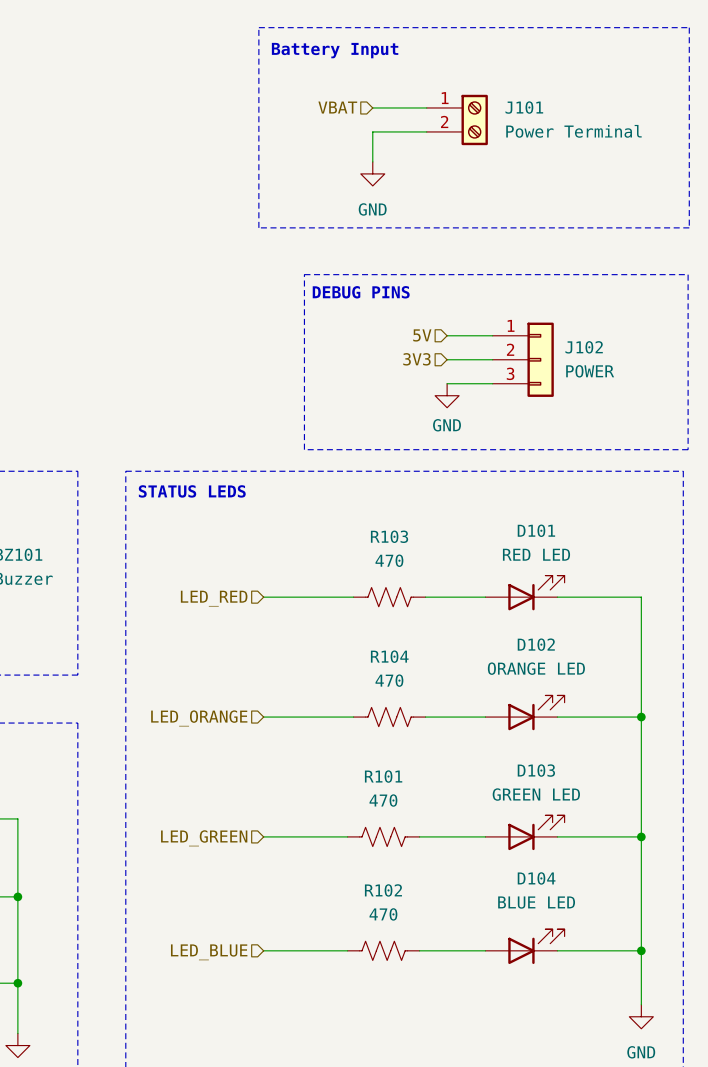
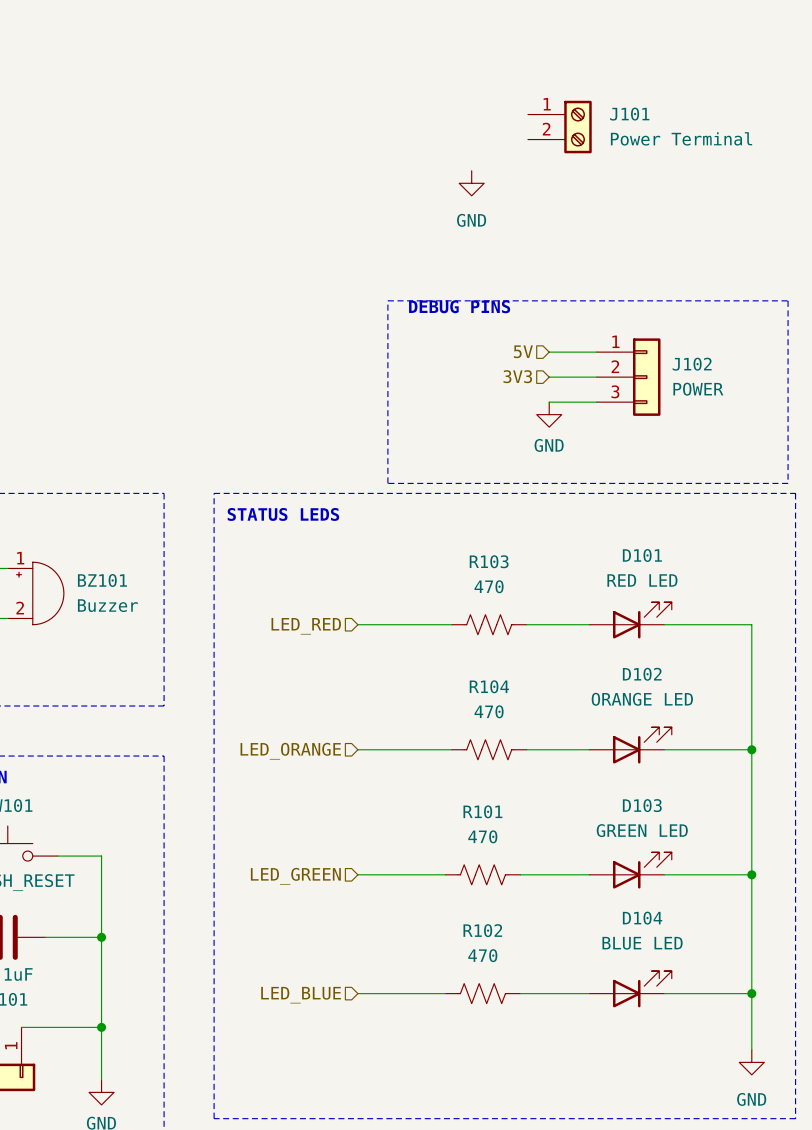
line: (258, 27) (689, 27) (689, 227) (258, 227) (258, 27) -> none
text: Battery Input (335, 50) -> none
hierarchical label: VBAT (337, 107) -> none
wire: (372, 107) (426, 107) -> none
wire: (426, 131) (372, 131) (372, 161) -> none
line: (304, 274) (688, 274) (688, 449) (304, 449) (304, 274) -> (387, 300) (788, 300) (788, 483) (387, 483) (387, 300)

